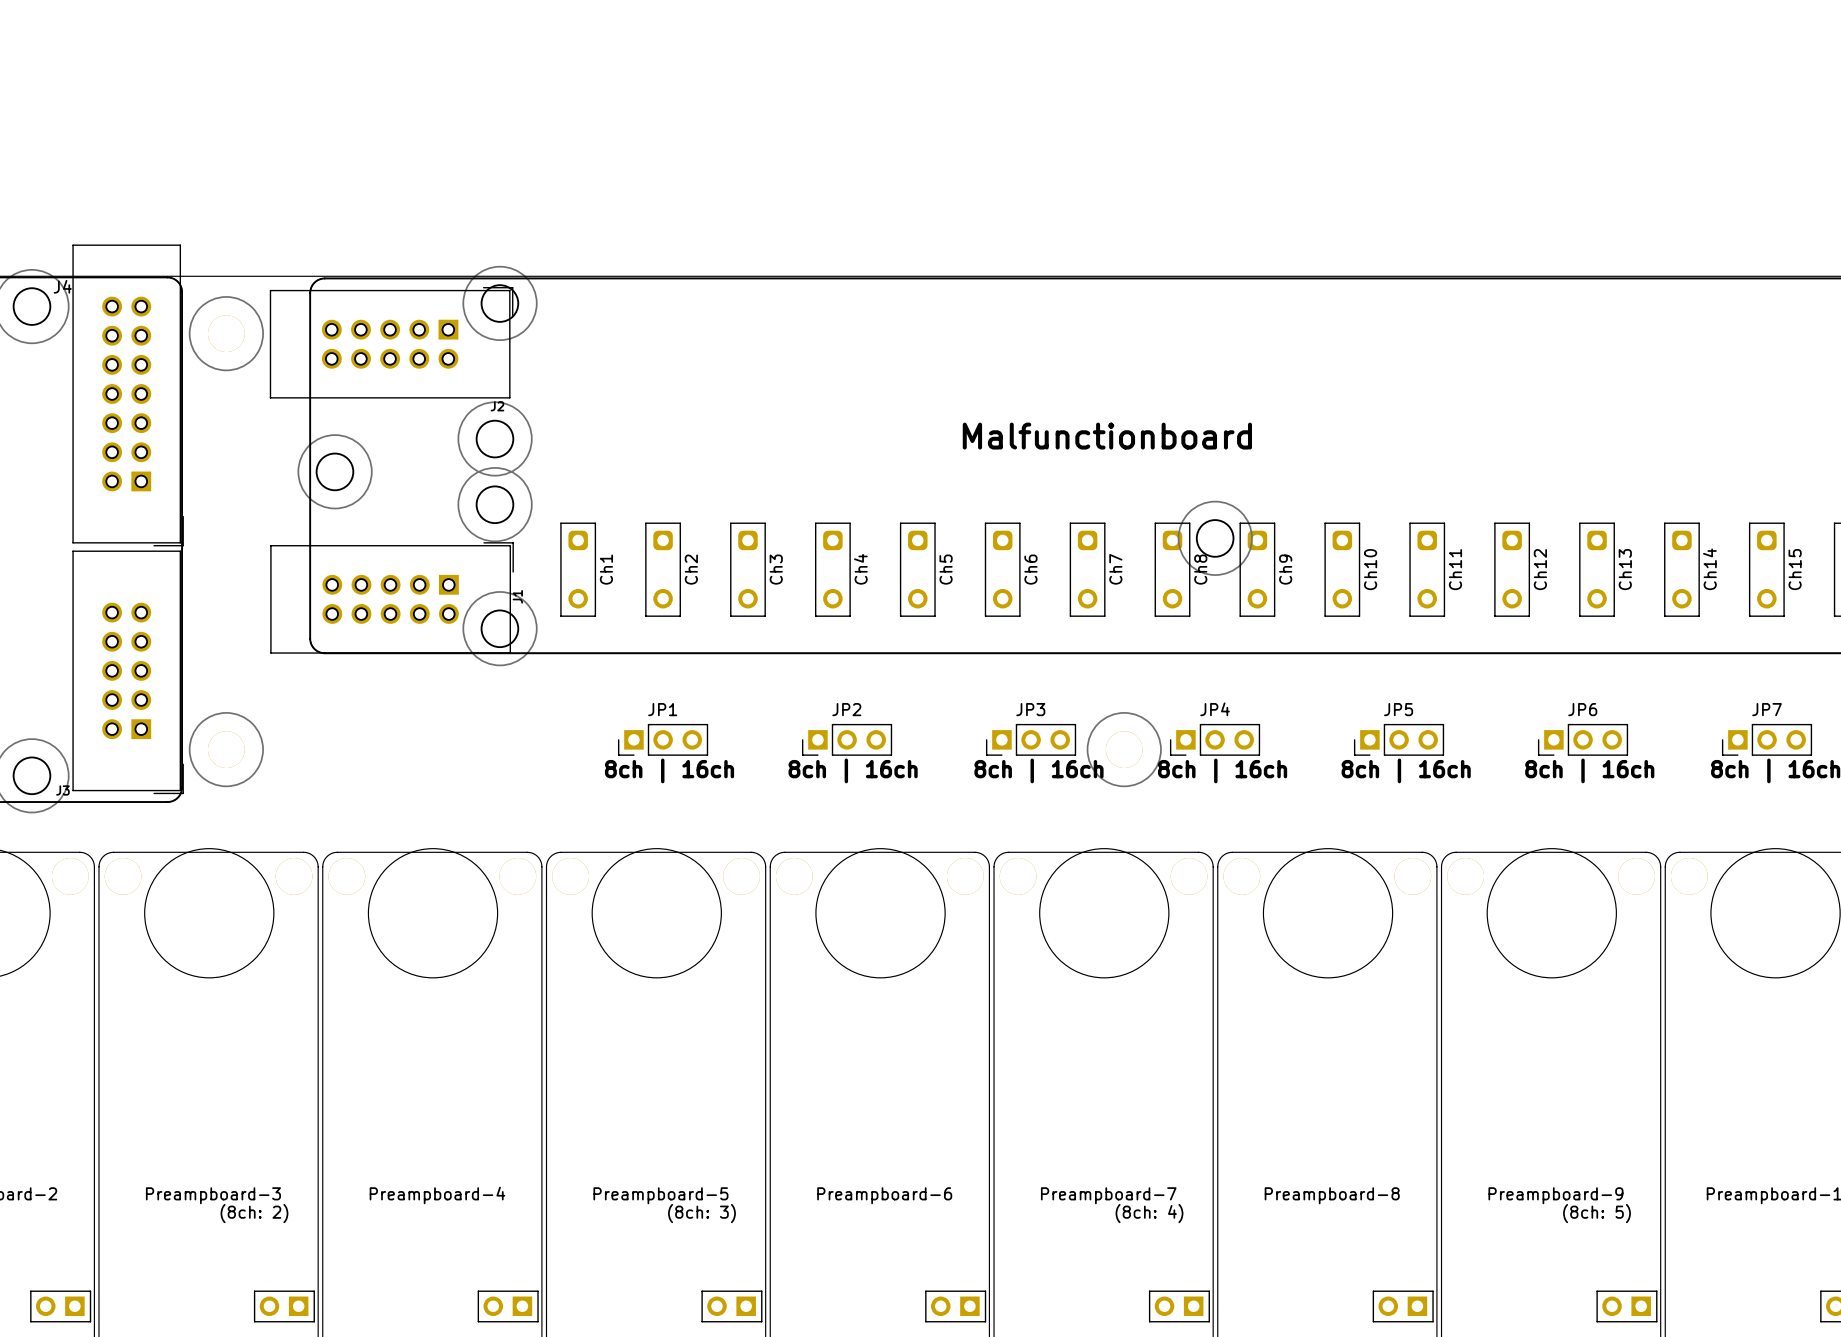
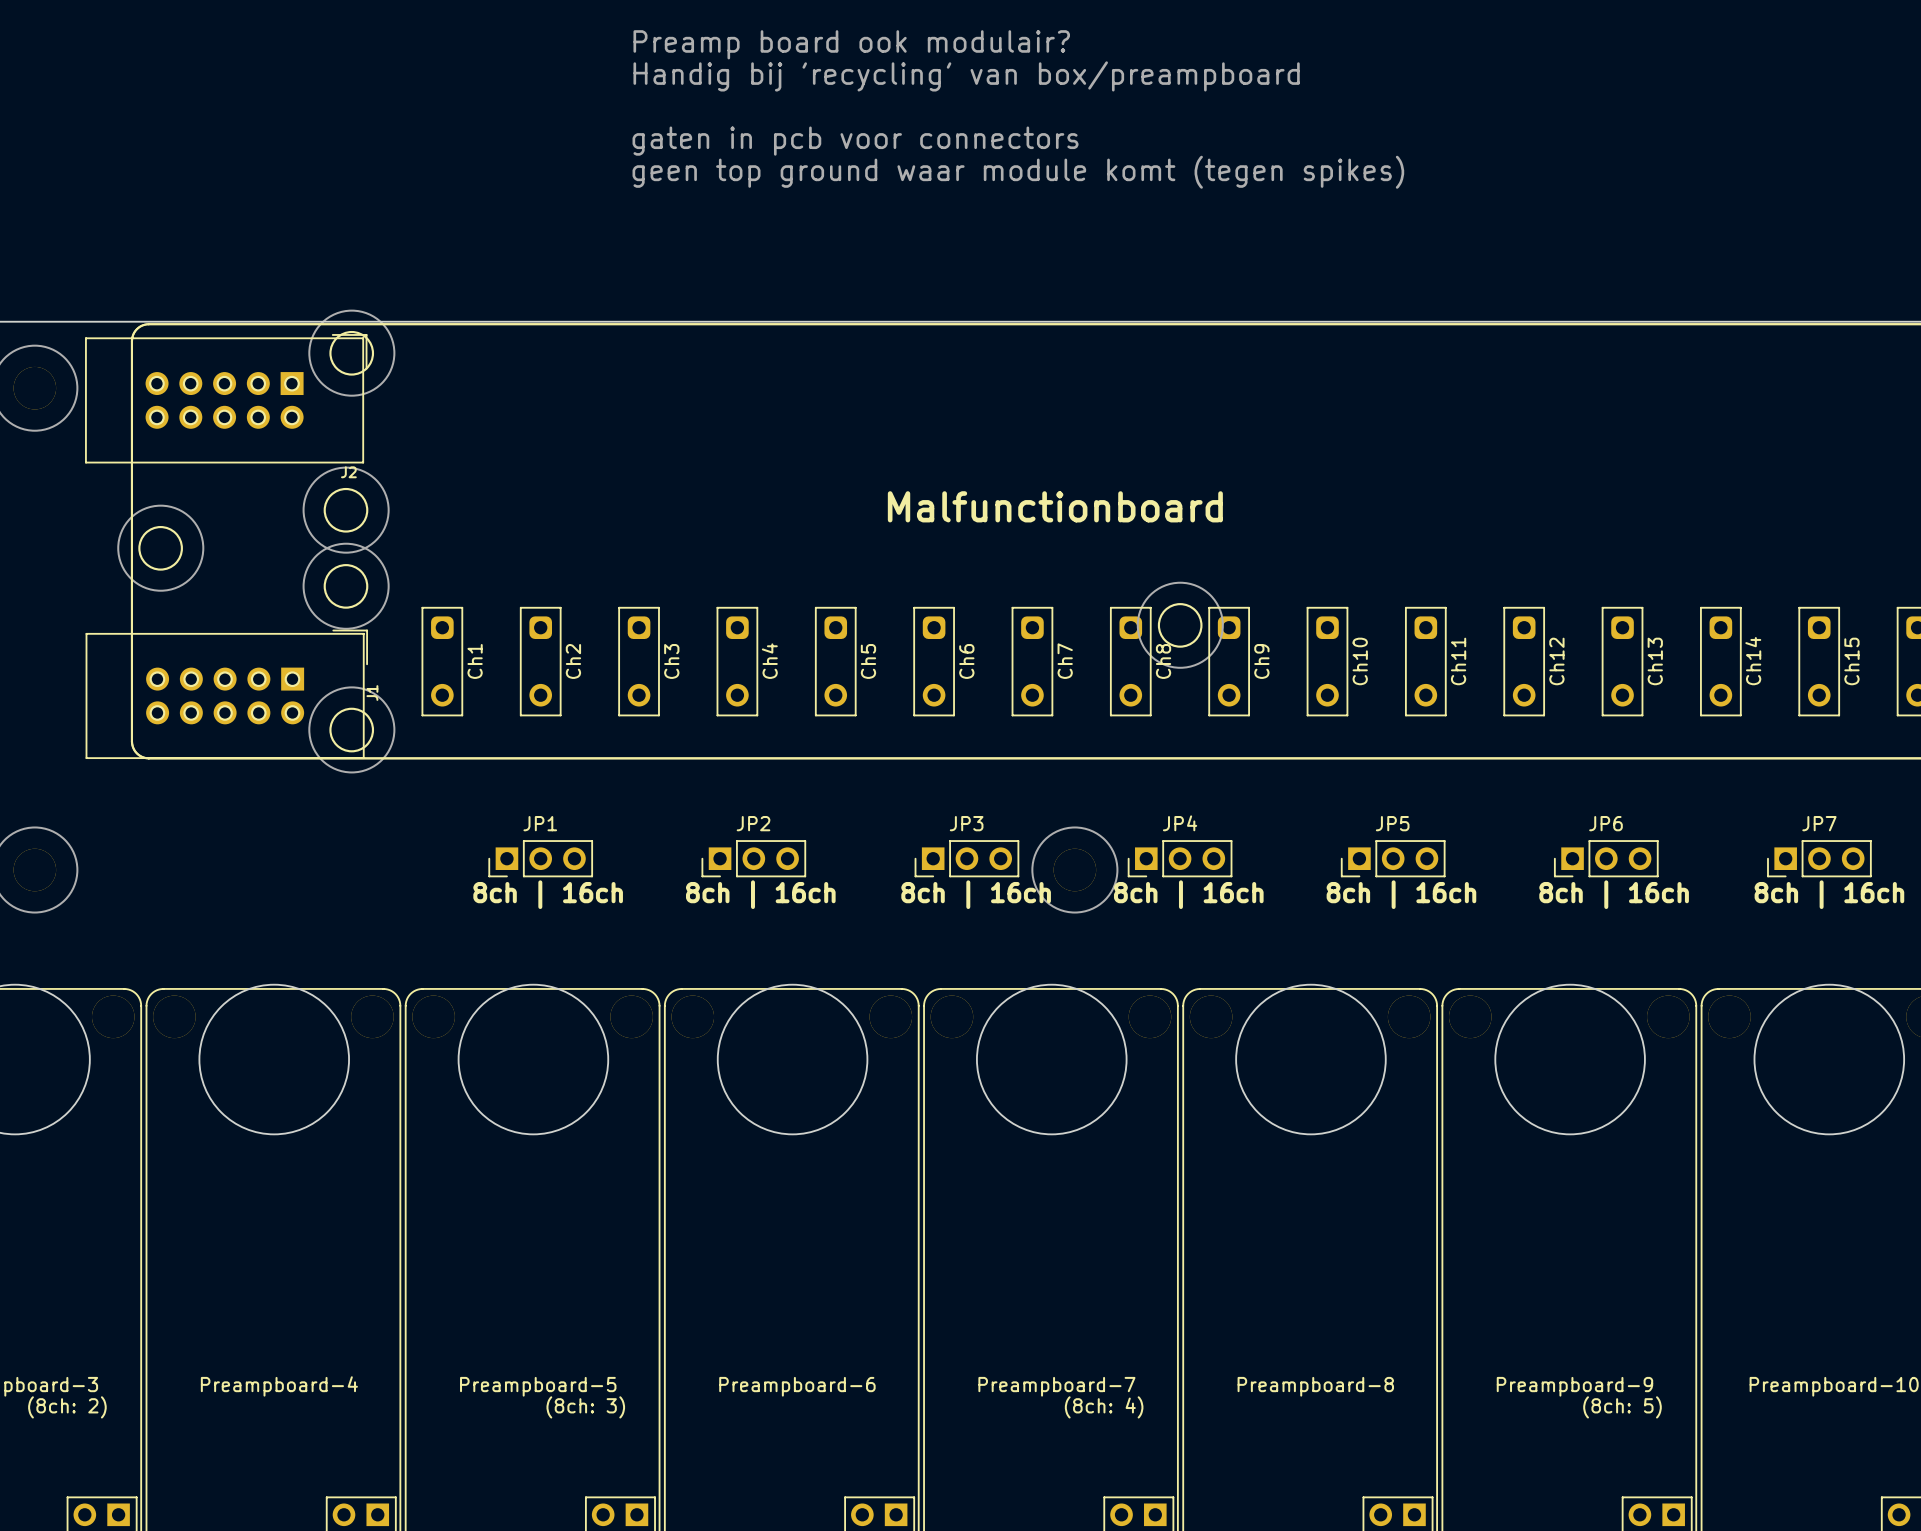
text: none -> Preamp board ook modulair? (851, 44)
text: none -> Handig bij 'recycling' van box/preampboard (966, 76)
text: none -> gaten in pcb voor connectors (855, 141)
text: none -> geen top ground waar module komt (tegen spikes) (1018, 172)

